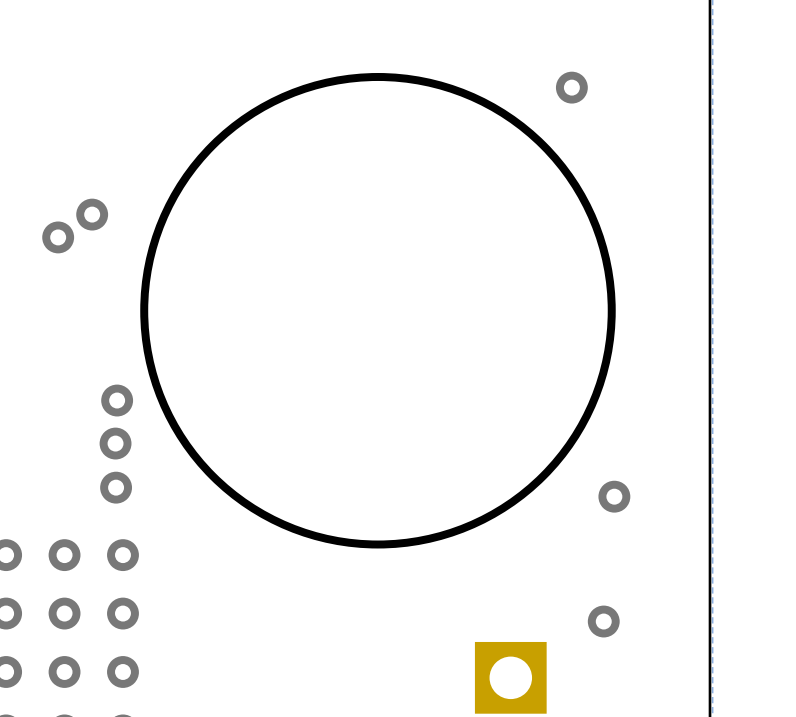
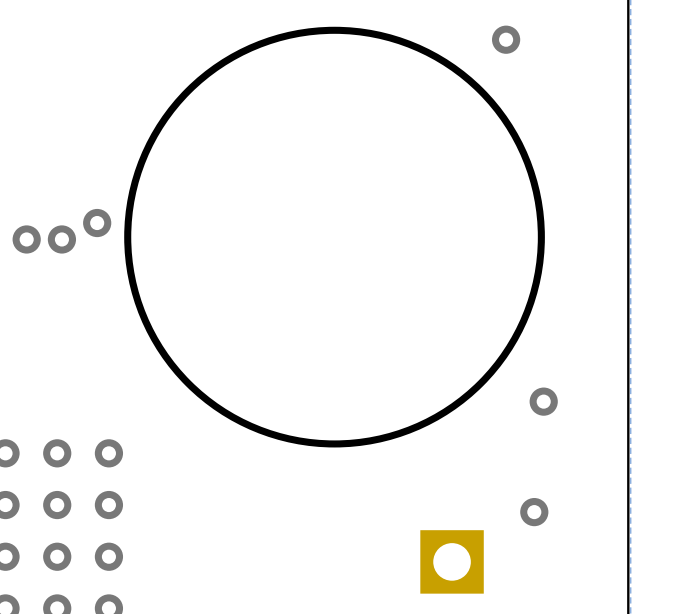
via: (92, 214) -> none
via: (58, 237) -> none
via: none -> (97, 223)
via: none -> (26, 239)
via: none -> (61, 239)
via: (117, 400) -> none
via: (115, 443) -> none
via: (116, 487) -> none

